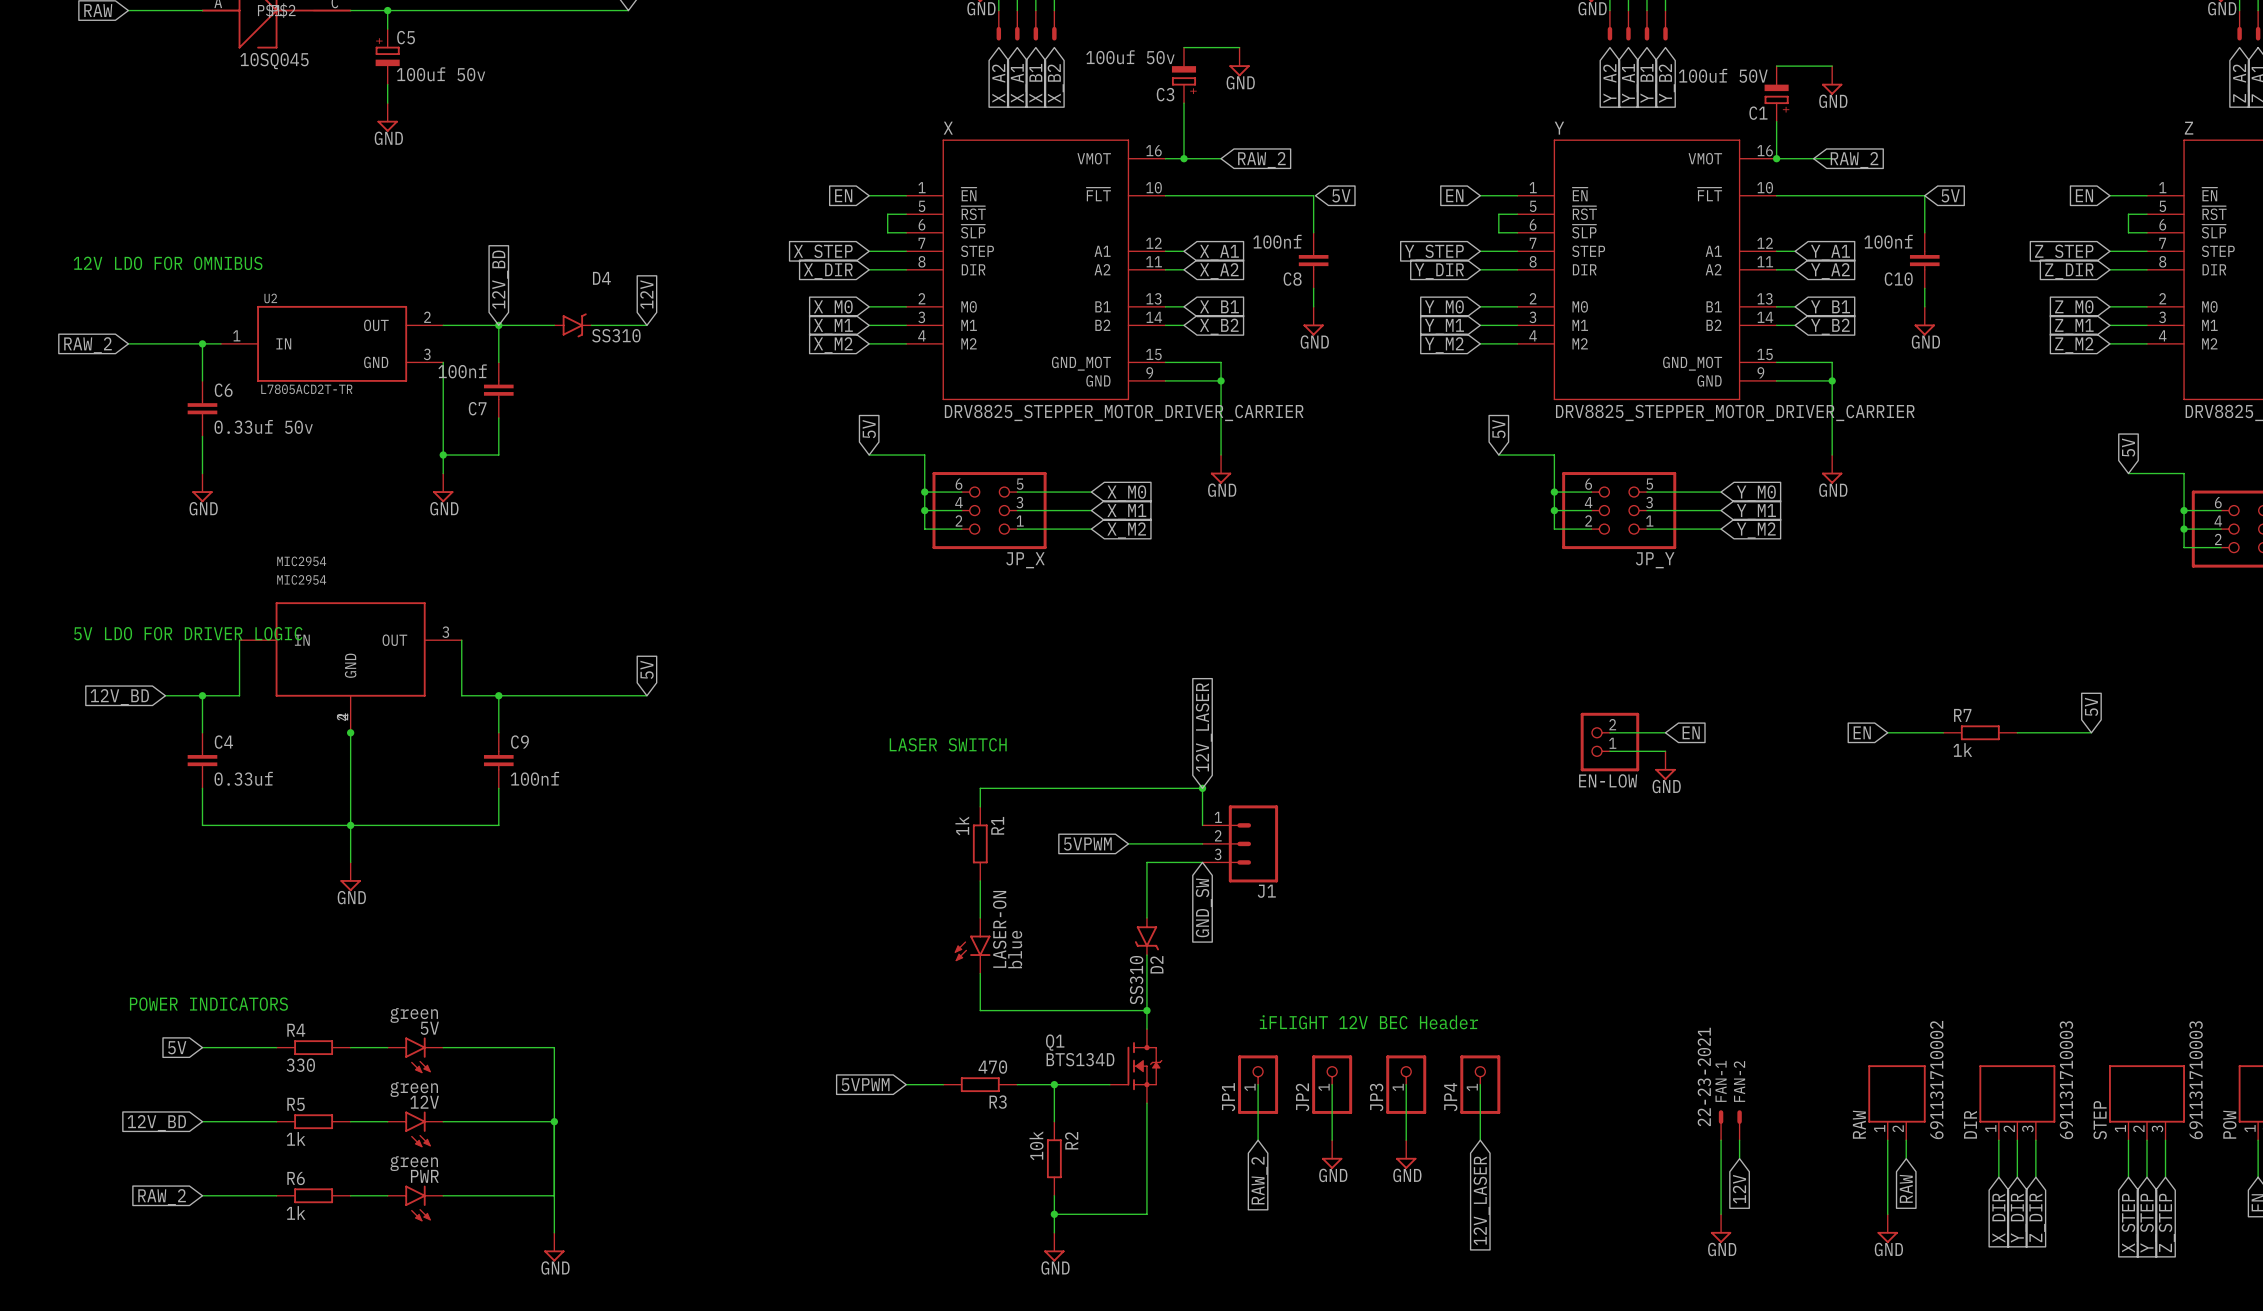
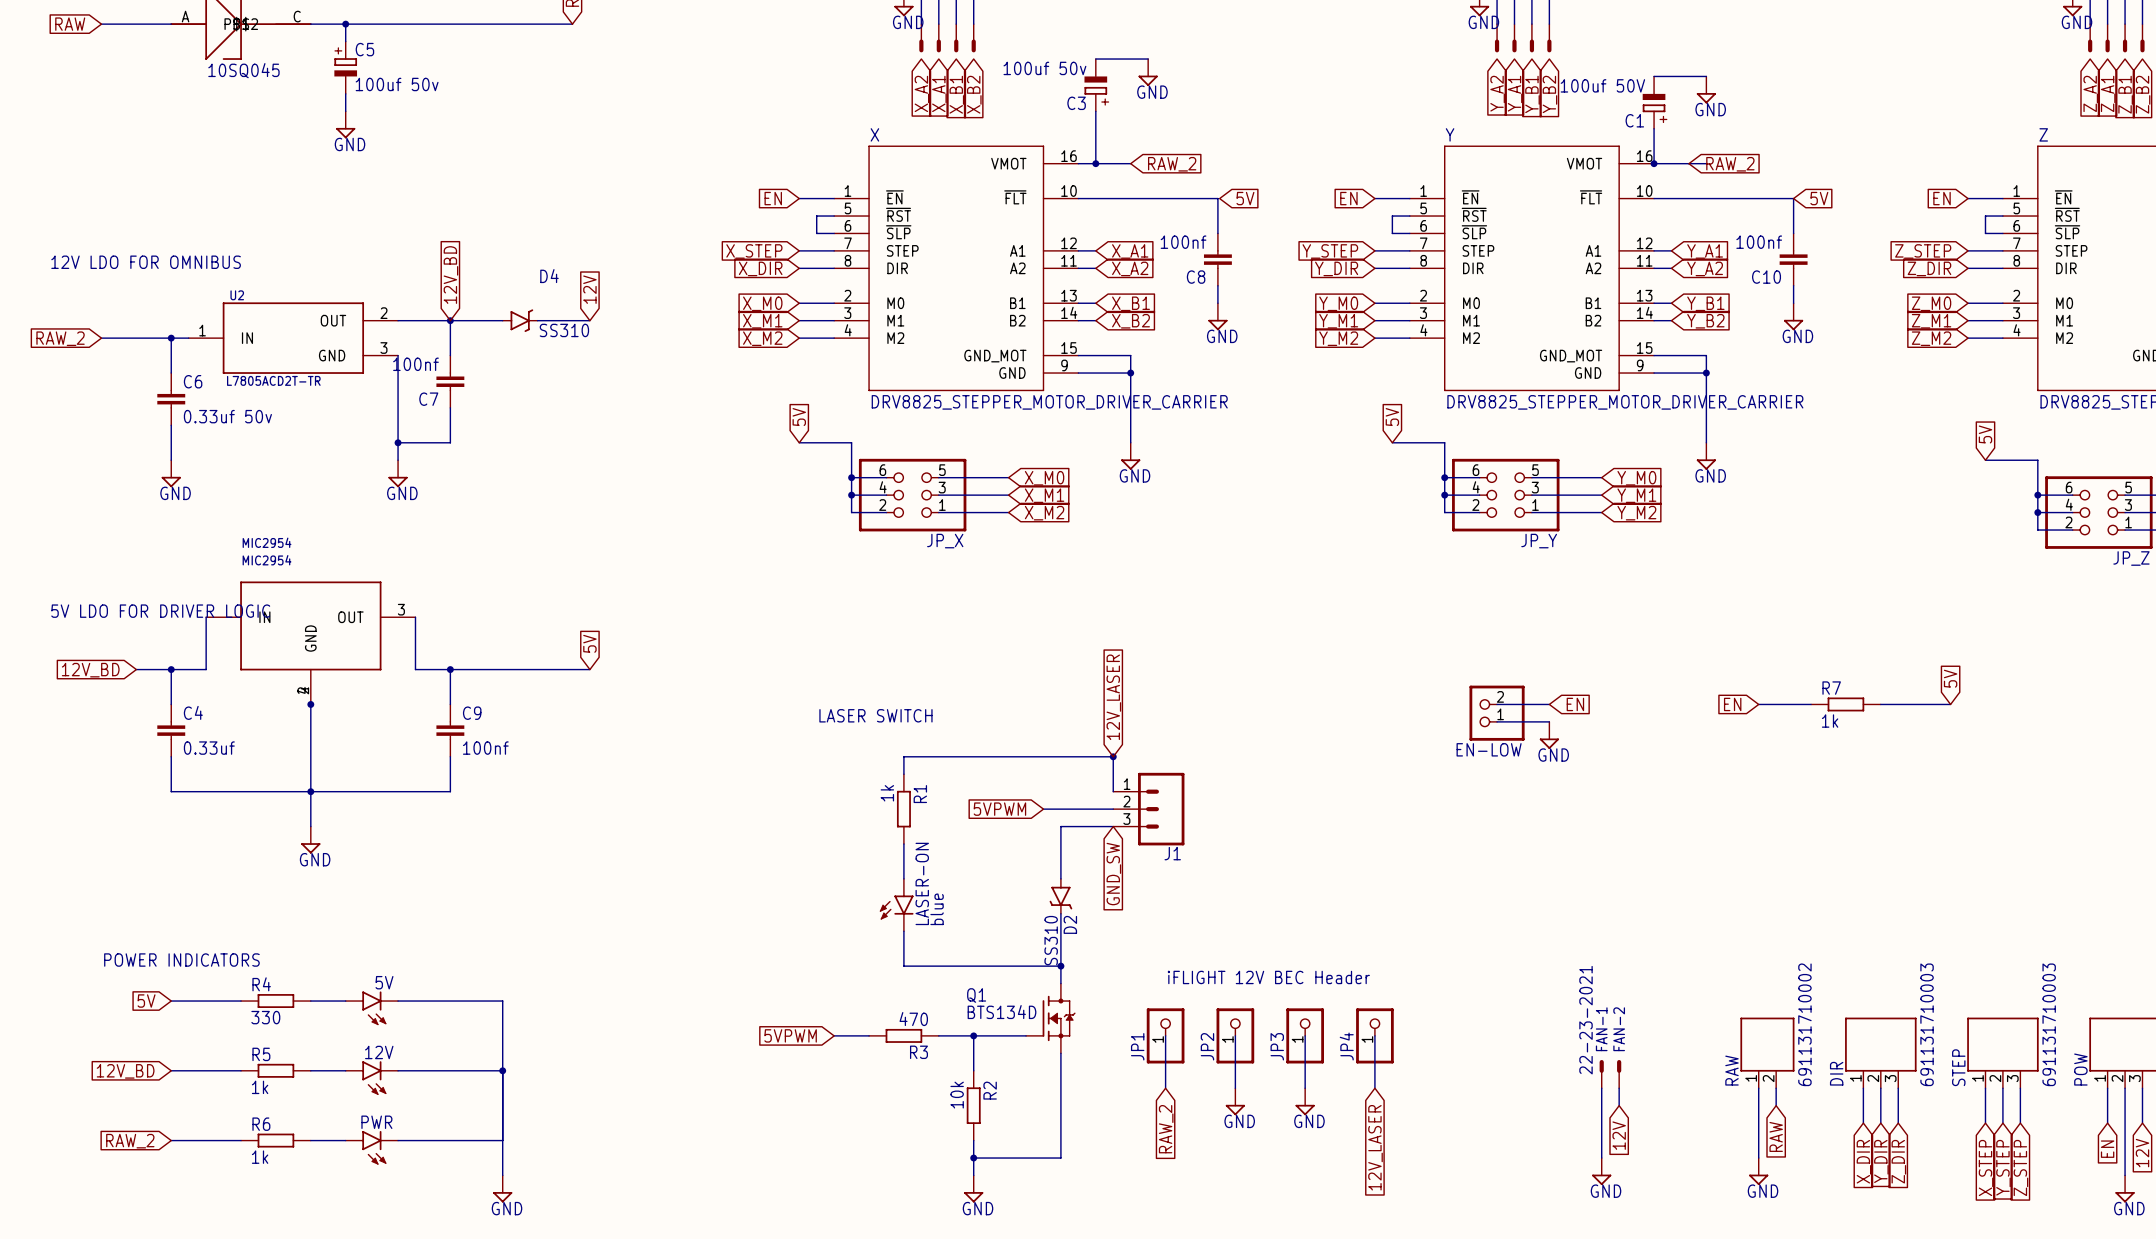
5V value: green (414, 1015) -> none
12V value: green (414, 1089) -> none
PWR value: green (414, 1163) -> none

